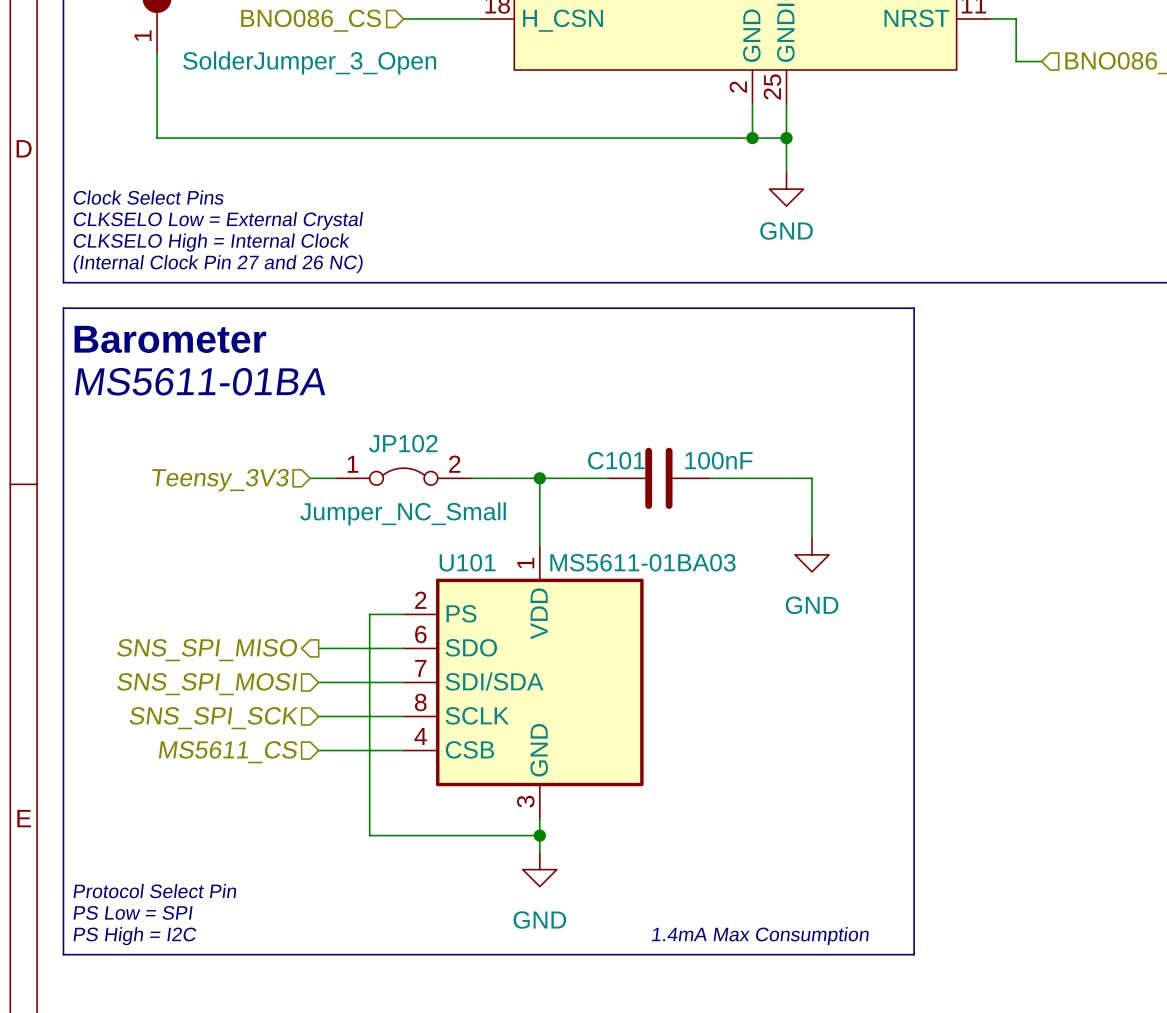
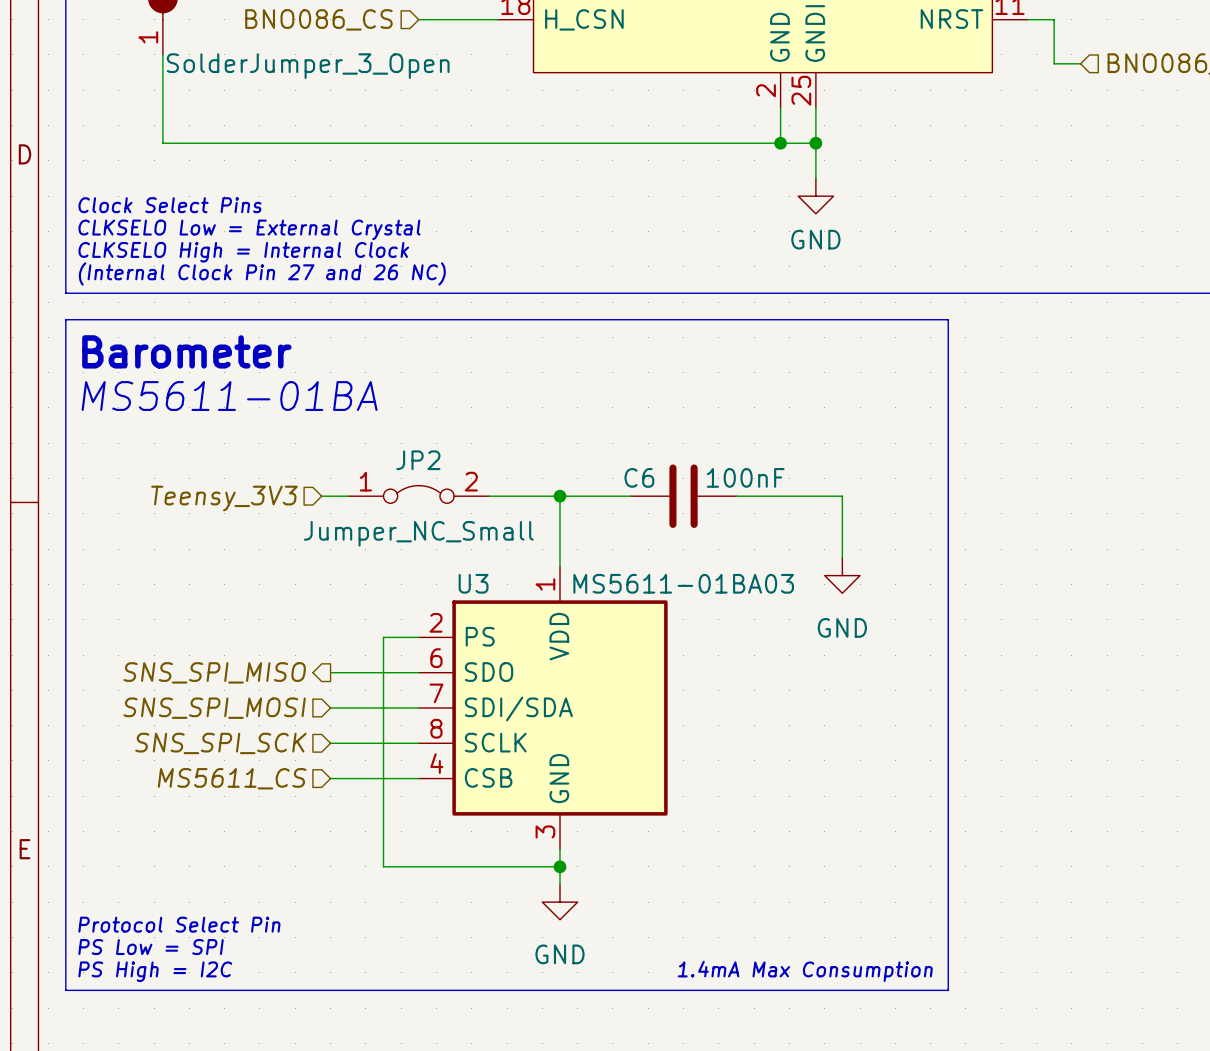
JP102 name: JP102 (403, 443) -> JP2 (418, 460)
C101 name: C101 (616, 460) -> C6 (639, 477)
U101 name: U101 (467, 562) -> U3 (473, 583)

